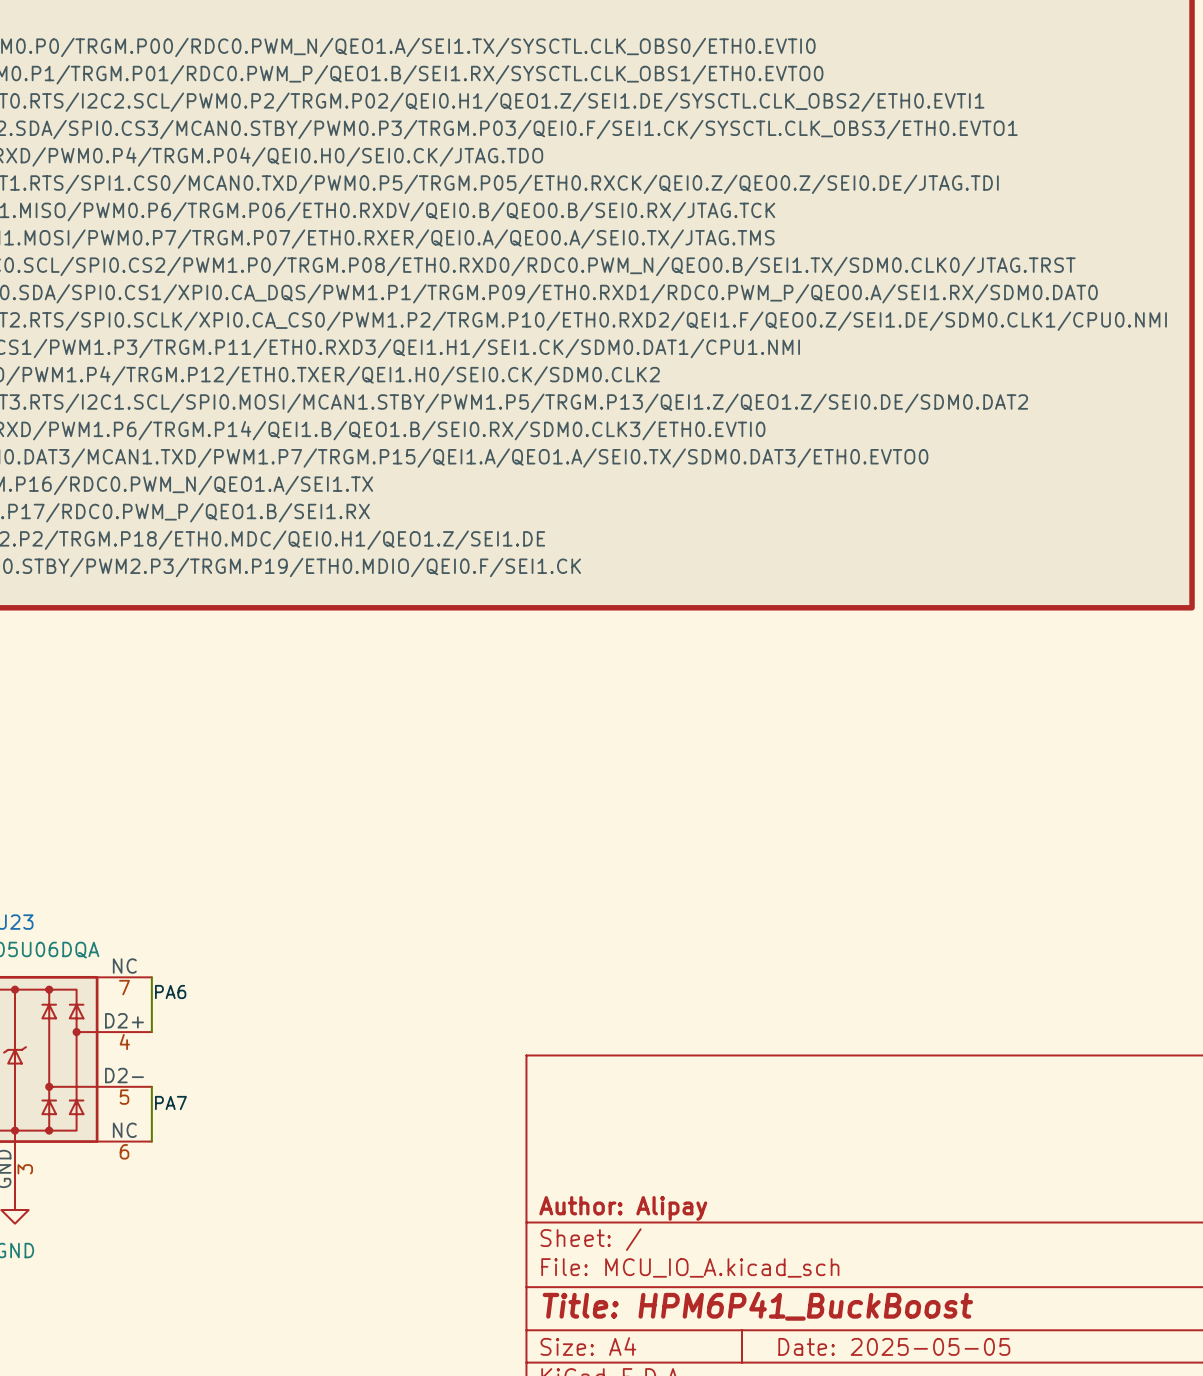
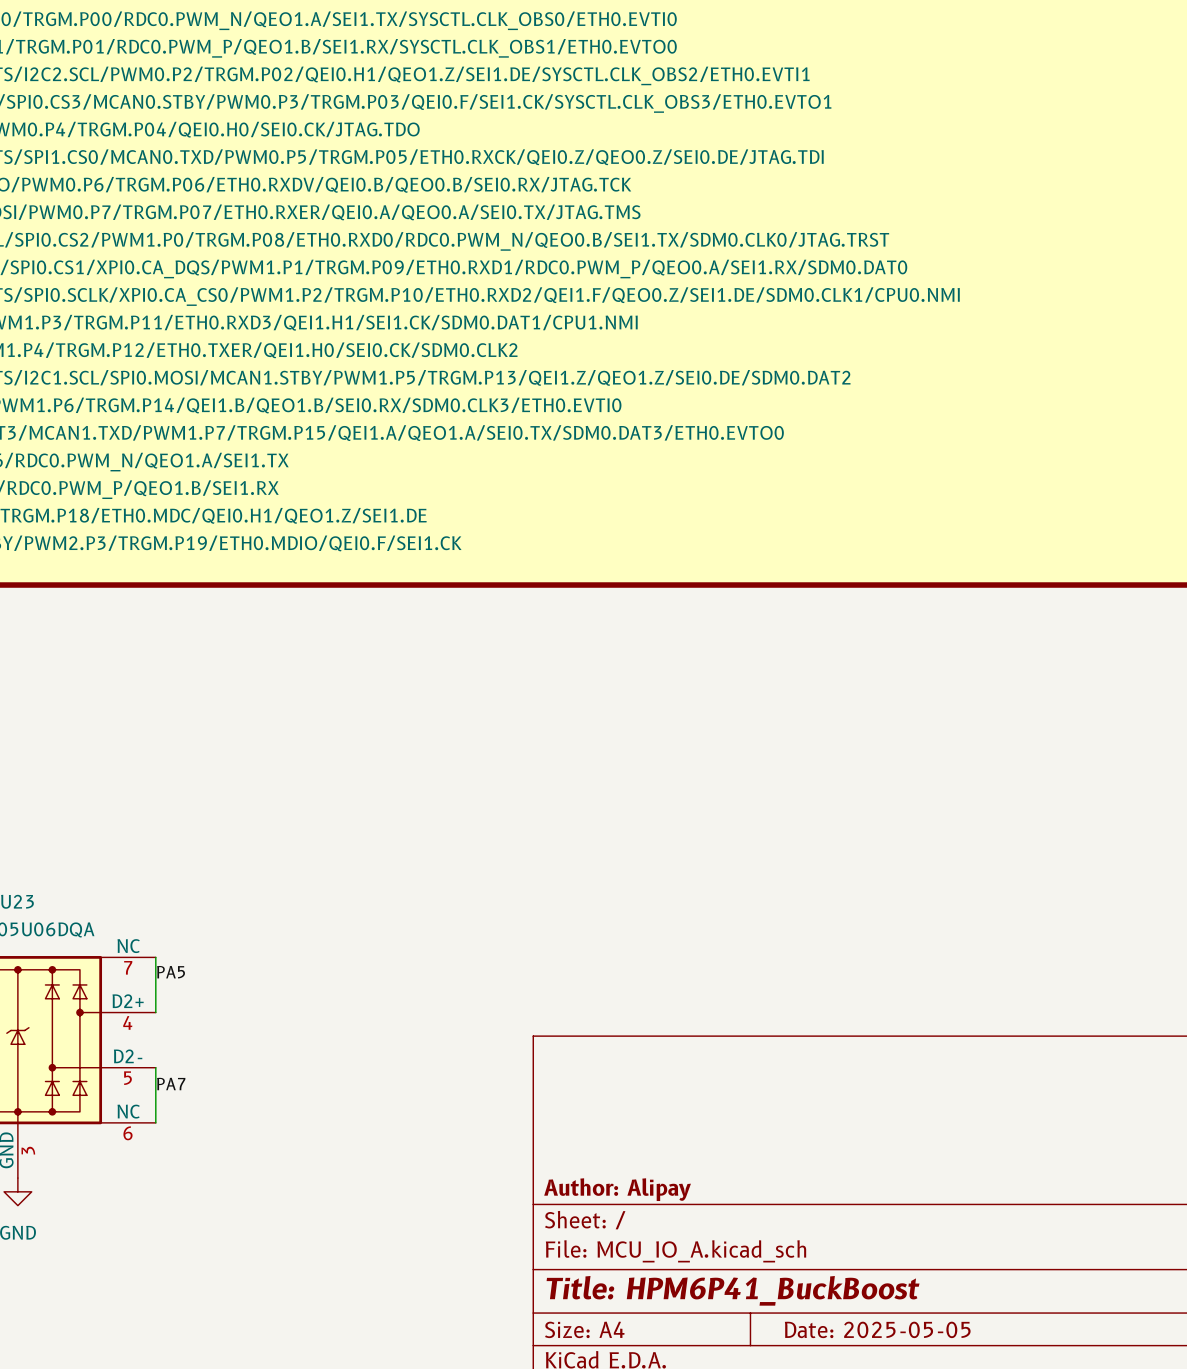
label: PA6 (170, 992) -> PA5 (171, 972)

